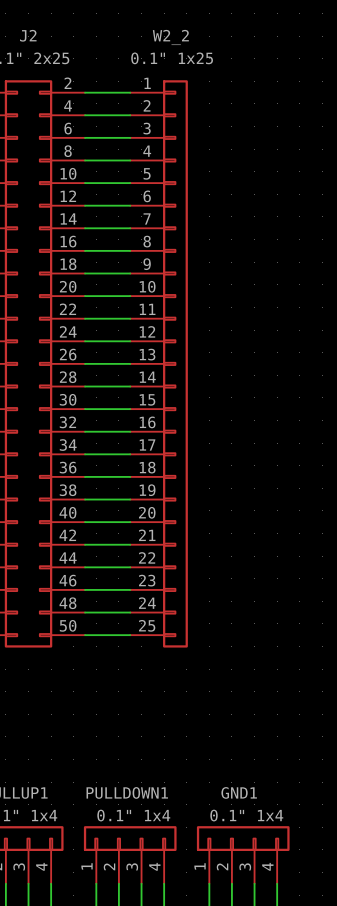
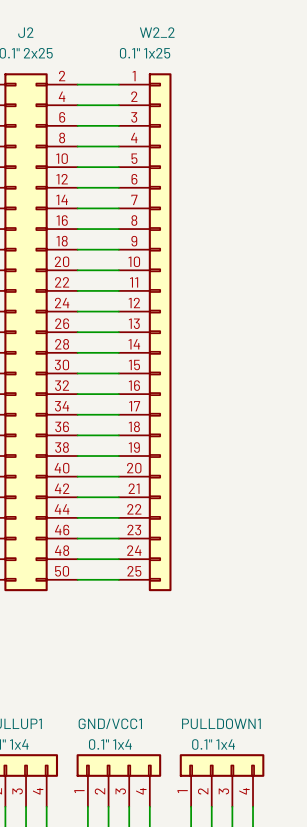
PULLDOWN1 name: PULLDOWN1 (127, 792) -> GND/VCC1 (110, 723)
GND1 name: GND1 (239, 792) -> PULLDOWN1 (221, 723)

